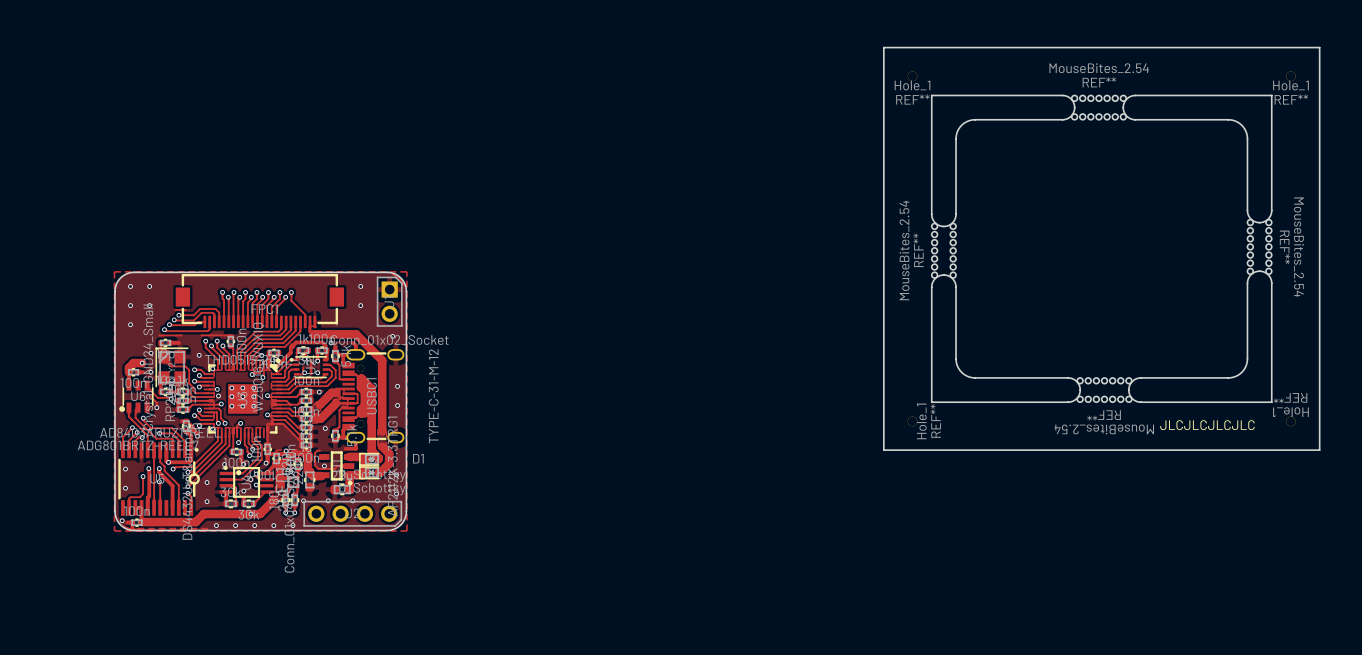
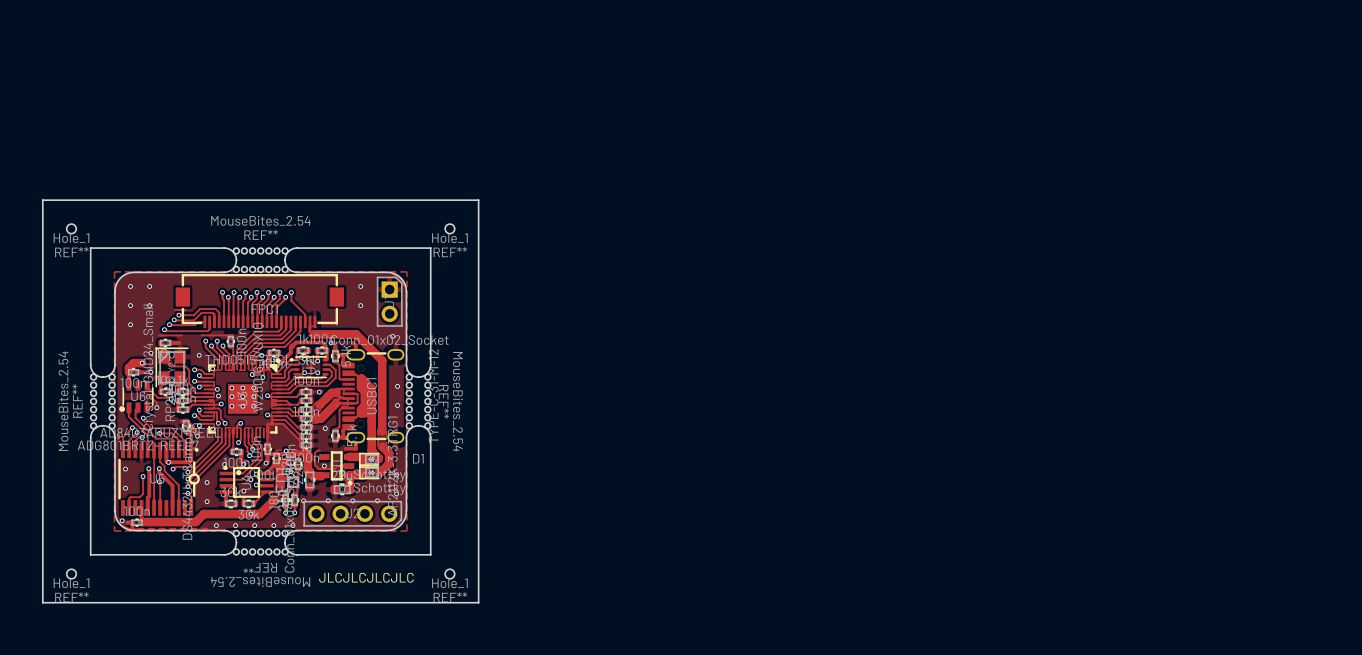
board edge: (883, 47) (1319, 47) (1319, 450) (883, 450) (883, 47) -> none
REF**: Hole_1 (912, 76) -> none
REF**: Hole_1 (1290, 76) -> none
board edge: (1062, 95) (931, 95) (931, 214) -> none
board edge: (1135, 95) (1271, 95) (1271, 210) -> none
REF**: MouseBites_2.54 (1098, 107) -> none
board edge: (1062, 119) (975, 119) (963, 123) (956, 136) (956, 214) -> none
board edge: (1135, 119) (1228, 119) (1240, 123) (1247, 136) (1247, 210) -> none
board edge: none -> (42, 200) (478, 200) (478, 602) (42, 602) (42, 200)
REF**: none -> Hole_1 (71, 228)
REF**: none -> Hole_1 (449, 228)
REF**: MouseBites_2.54 (1259, 246) -> none
board edge: none -> (224, 248) (90, 248) (90, 365)
board edge: none -> (297, 248) (430, 248) (430, 365)
REF**: MouseBites_2.54 (943, 250) -> none
REF**: none -> MouseBites_2.54 (260, 260)
board edge: (224, 272) (297, 272) -> none
board edge: (1247, 283) (1247, 360) (1240, 373) (1228, 377) (1140, 377) -> none
board edge: (1271, 283) (1271, 402) (1140, 402) -> none
board edge: (931, 287) (931, 402) (1068, 402) -> none
board edge: (956, 287) (956, 360) (963, 373) (975, 377) (1068, 377) -> none
board edge: (114, 365) (114, 437) -> none
board edge: (406, 365) (406, 437) -> none
REF**: MouseBites_2.54 (1104, 390) -> none
REF**: none -> MouseBites_2.54 (102, 401)
REF**: none -> MouseBites_2.54 (418, 401)
REF**: Hole_1 (912, 421) -> none
REF**: Hole_1 (1290, 421) -> none
text: JLCJLCJLCJLC (1207, 425) -> none
track: none -> (118, 433) (118, 438) (118, 434)
board edge: none -> (90, 437) (90, 554) (224, 554)
board edge: none -> (430, 437) (430, 554) (297, 554)
board edge: (224, 530) (297, 530) -> none
REF**: none -> MouseBites_2.54 (260, 542)
REF**: none -> Hole_1 (71, 574)
REF**: none -> Hole_1 (449, 574)
text: none -> JLCJLCJLCJLC (366, 577)

